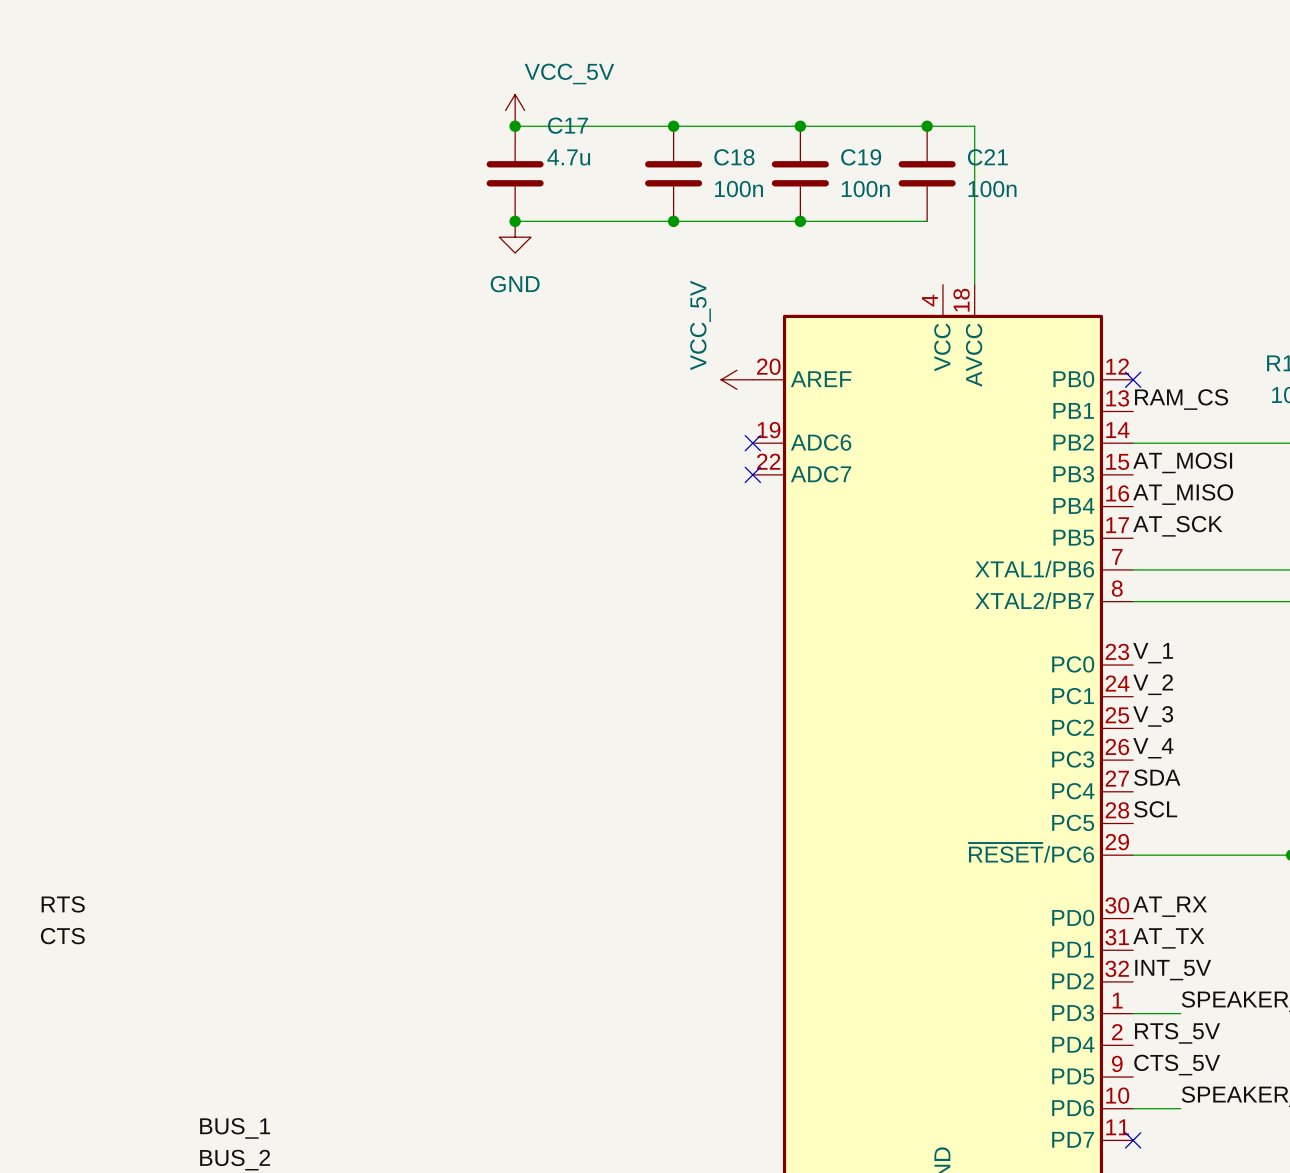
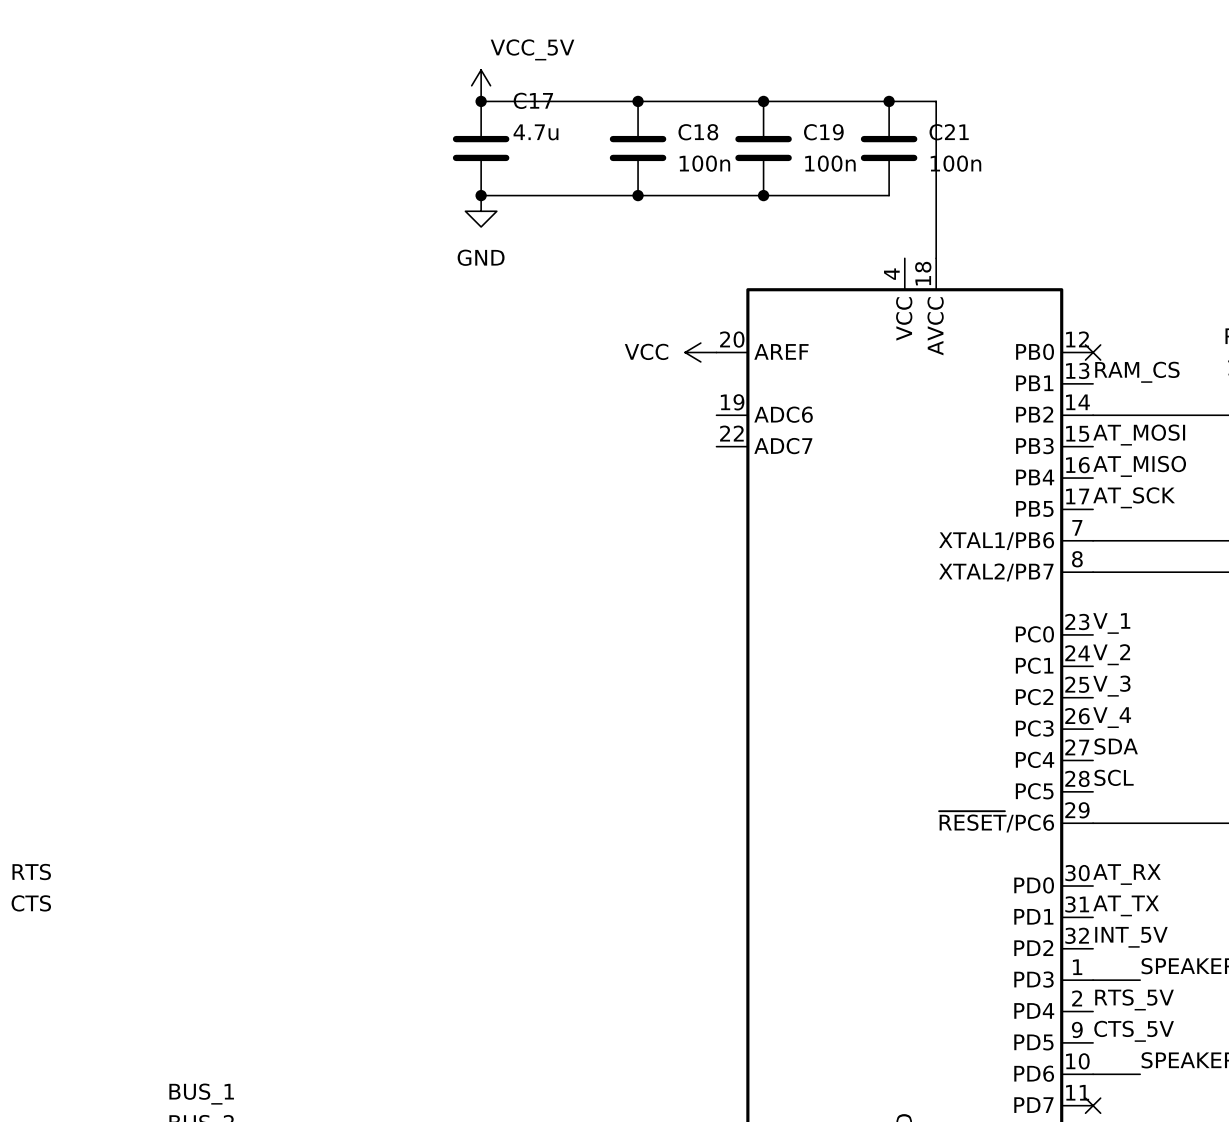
power symbol: VCC_5V (736, 379) -> VCC (700, 352)
no-connect mark: (752, 443) -> none
no-connect mark: (752, 474) -> none

